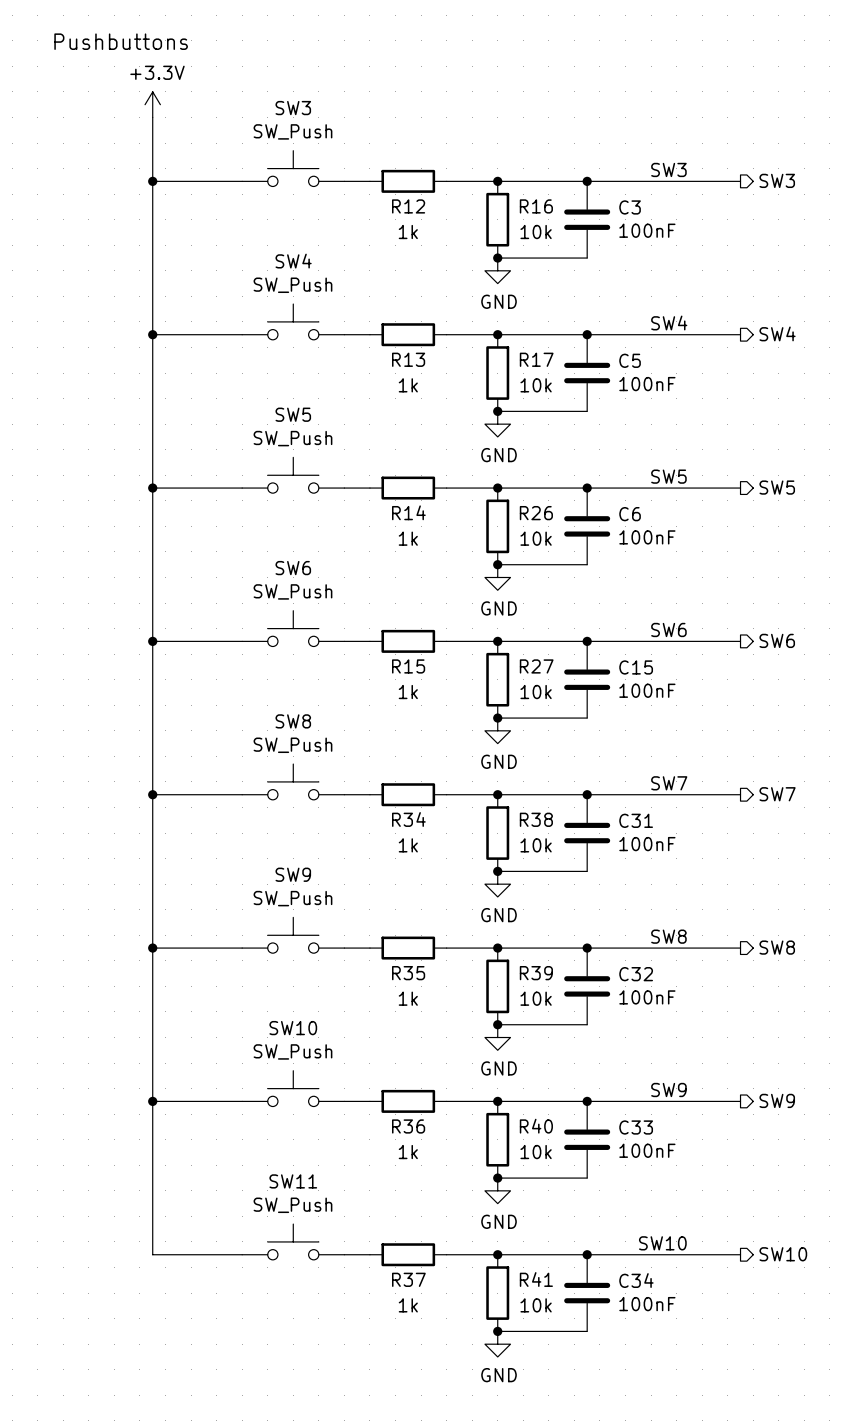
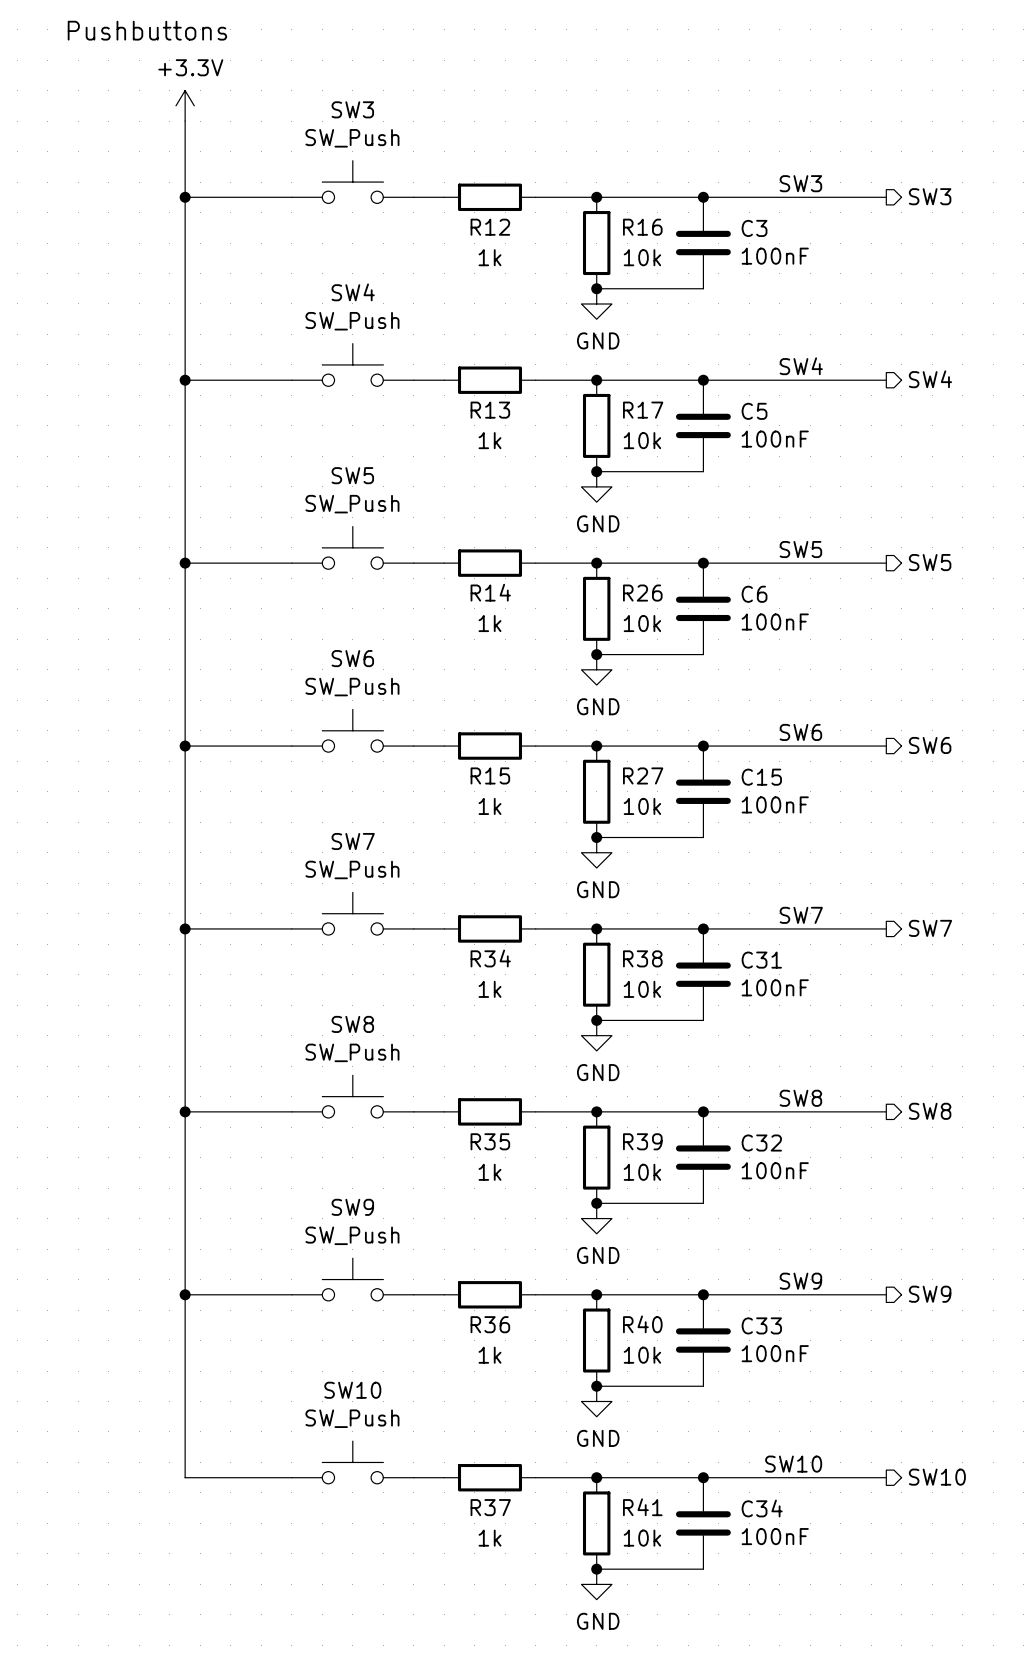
SW8 name: SW8 (293, 721) -> SW7 (353, 841)
SW9 name: SW9 (293, 874) -> SW8 (352, 1024)
SW10 name: SW10 (293, 1028) -> SW9 (352, 1207)
SW11 name: SW11 (293, 1181) -> SW10 (352, 1390)

